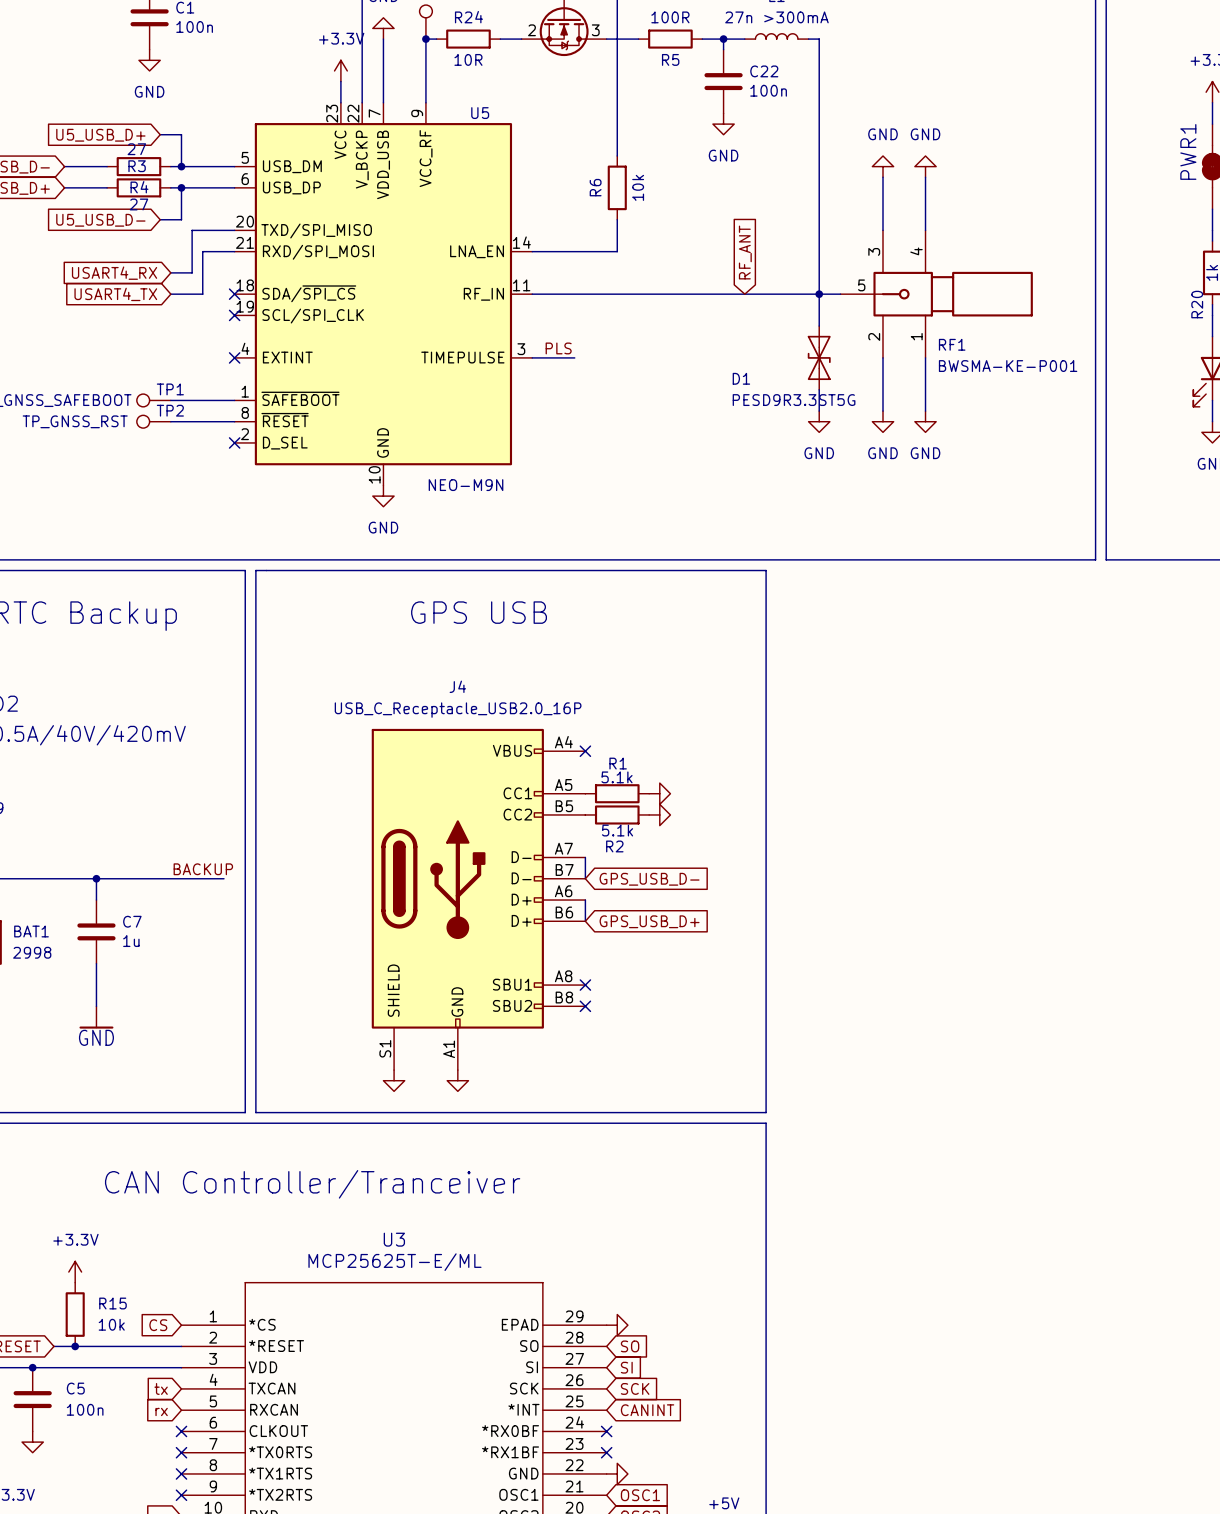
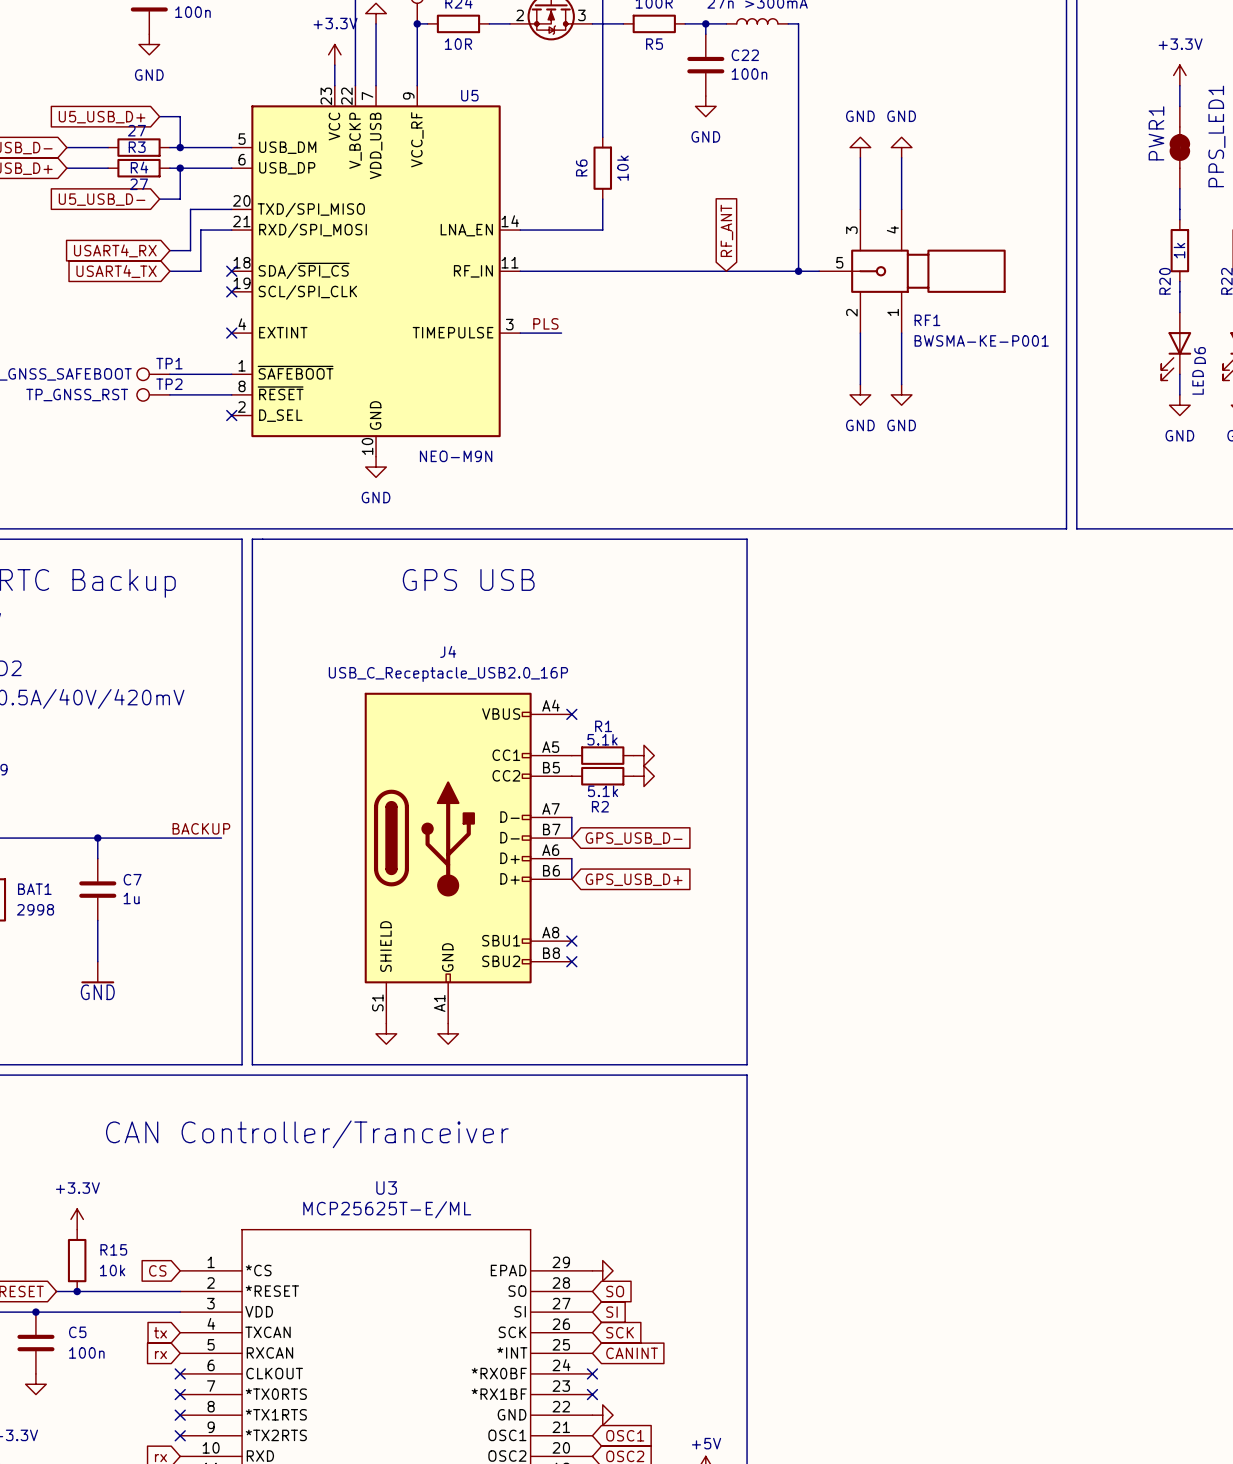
wire: (819, 294) (819, 326) -> none
D1: PESD9R3.3ST5G (819, 357) -> none
wire: (819, 389) (819, 411) -> none
power symbol: GND (819, 421) -> none

